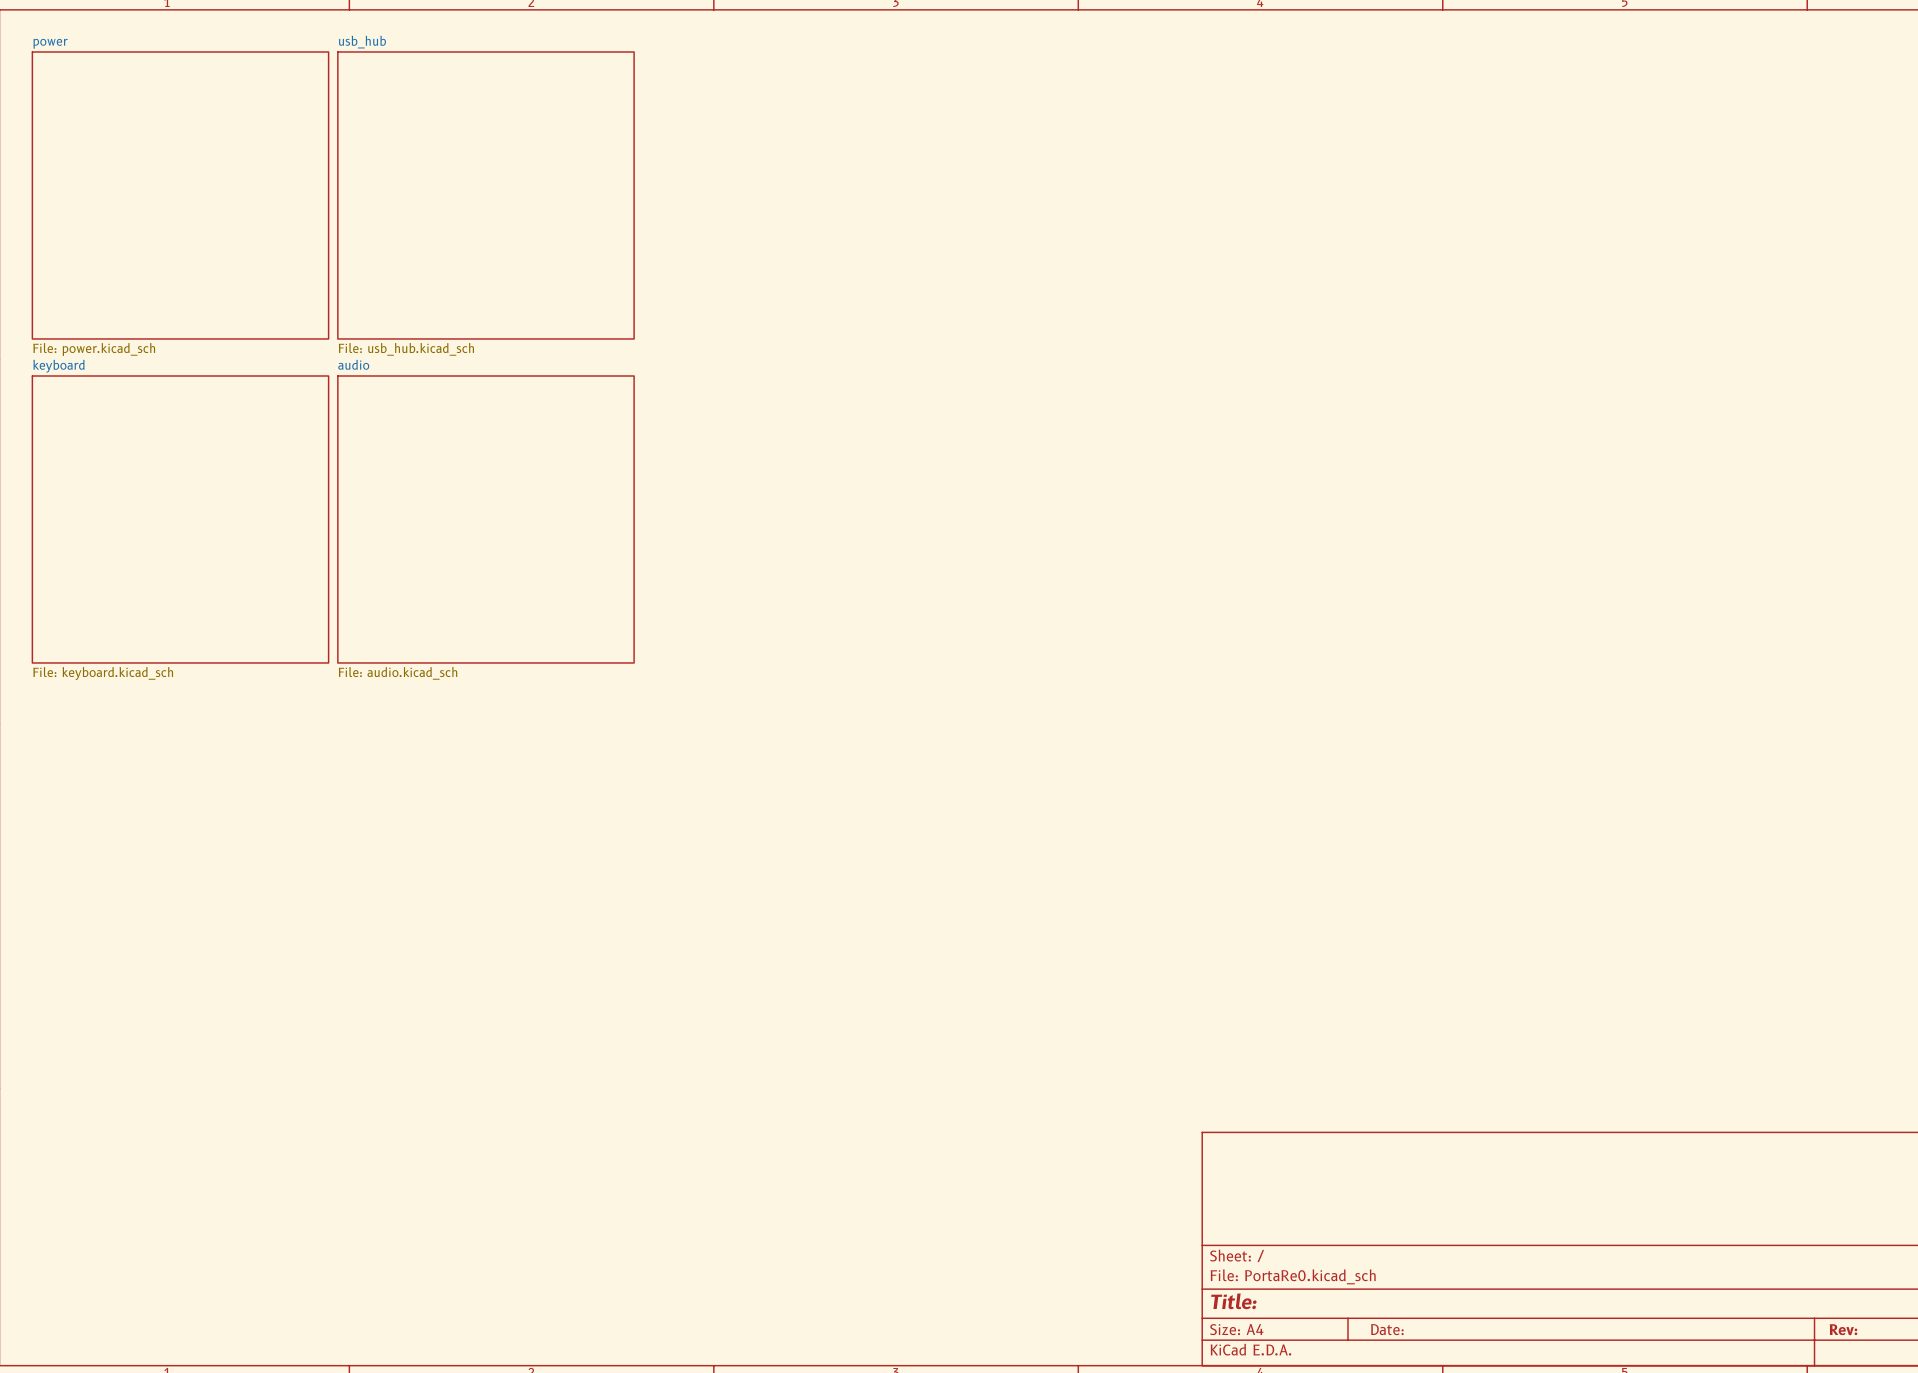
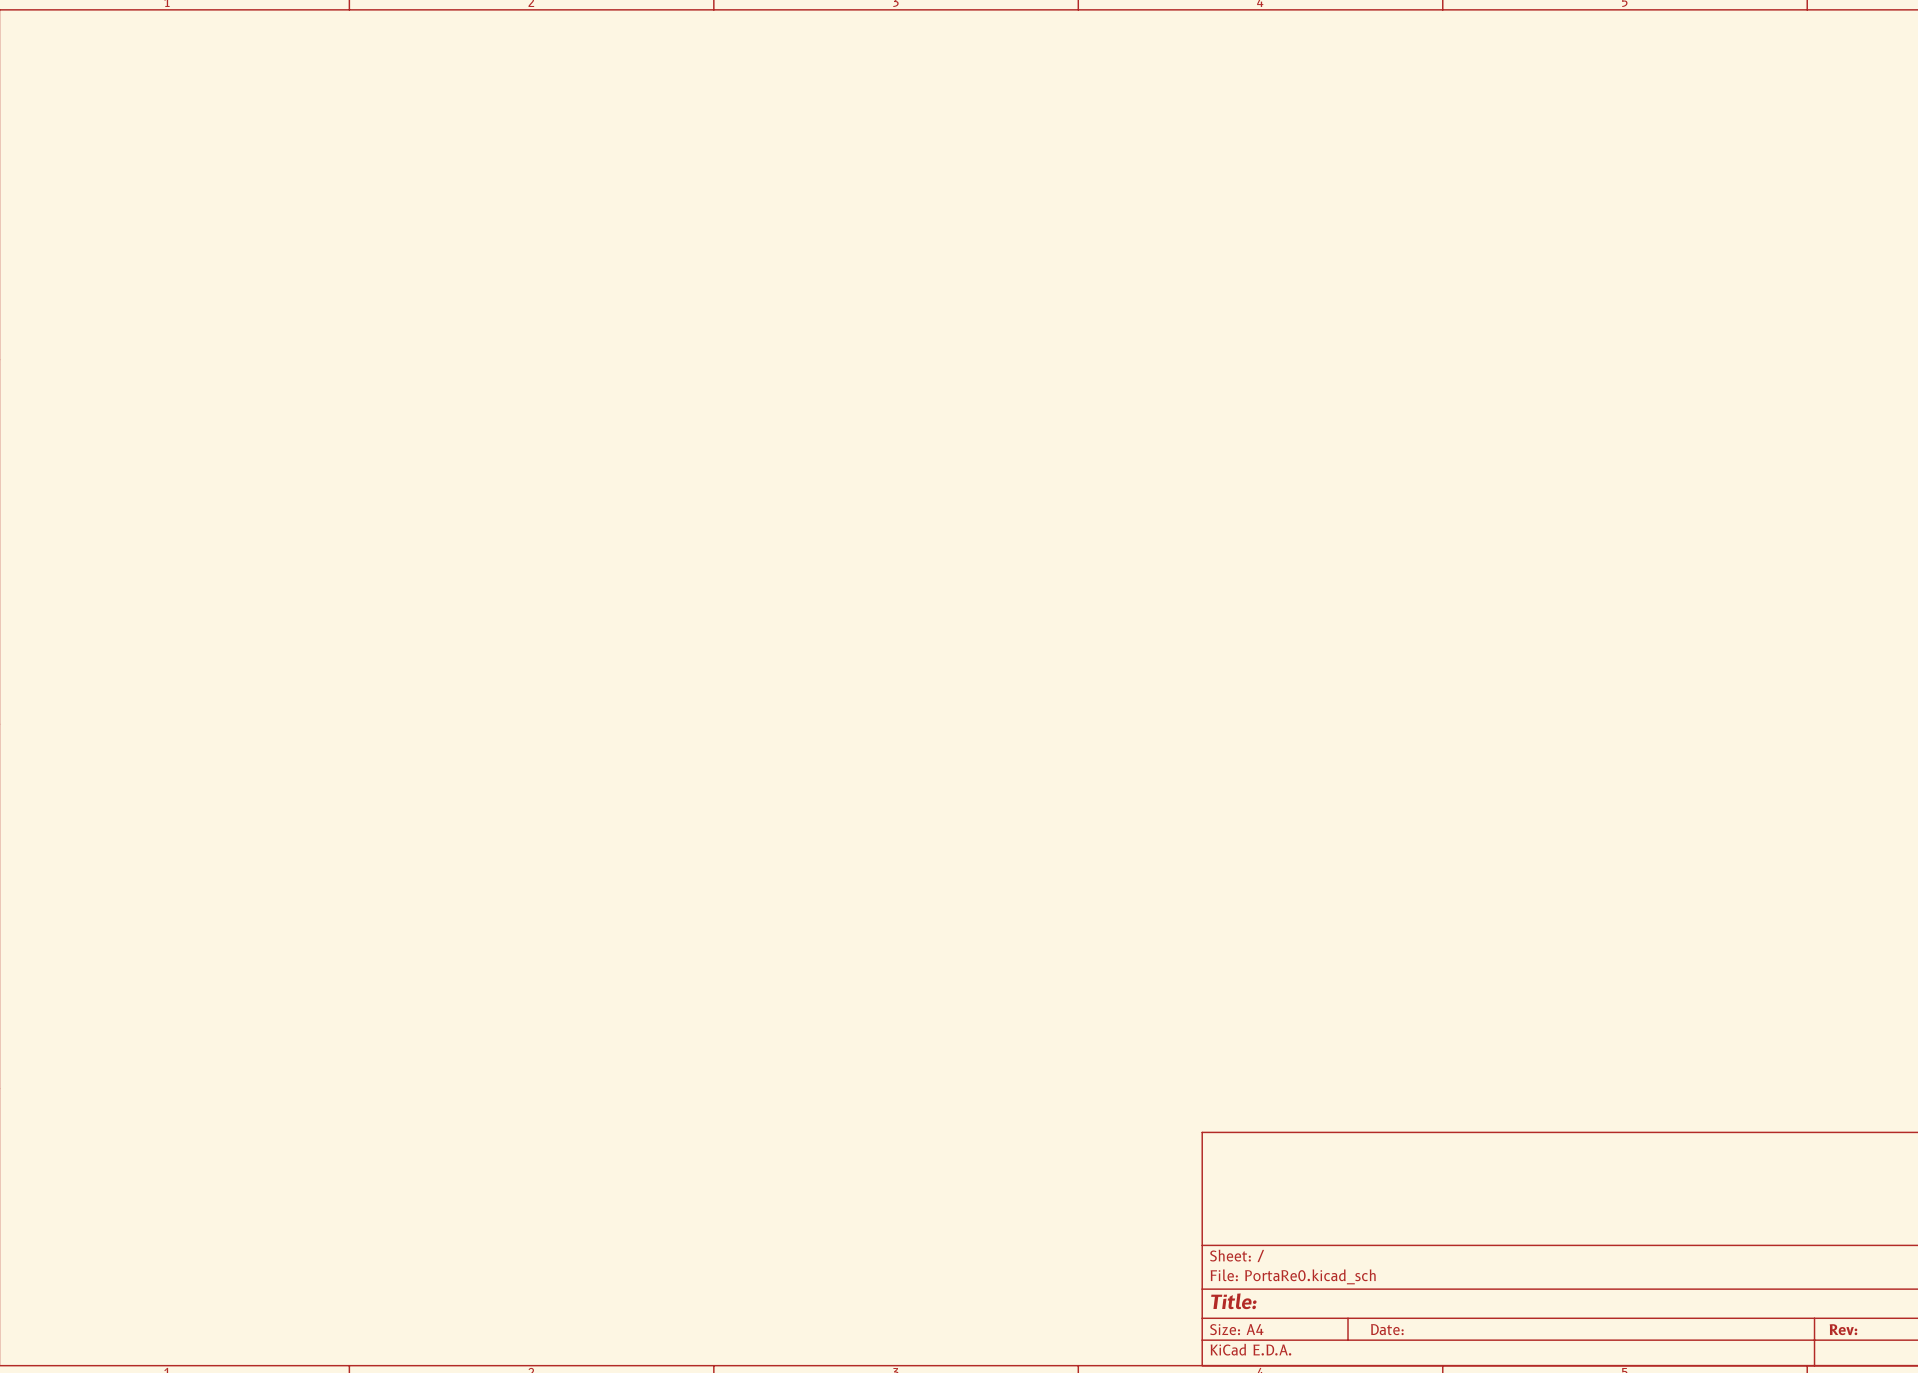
sheet power: File: power.kicad_sch (180, 195) -> none
sheet usb_hub: File: usb_hub.kicad_sch (485, 195) -> none
sheet keyboard: File: keyboard.kicad_sch (180, 519) -> none
sheet audio: File: audio.kicad_sch (485, 519) -> none

